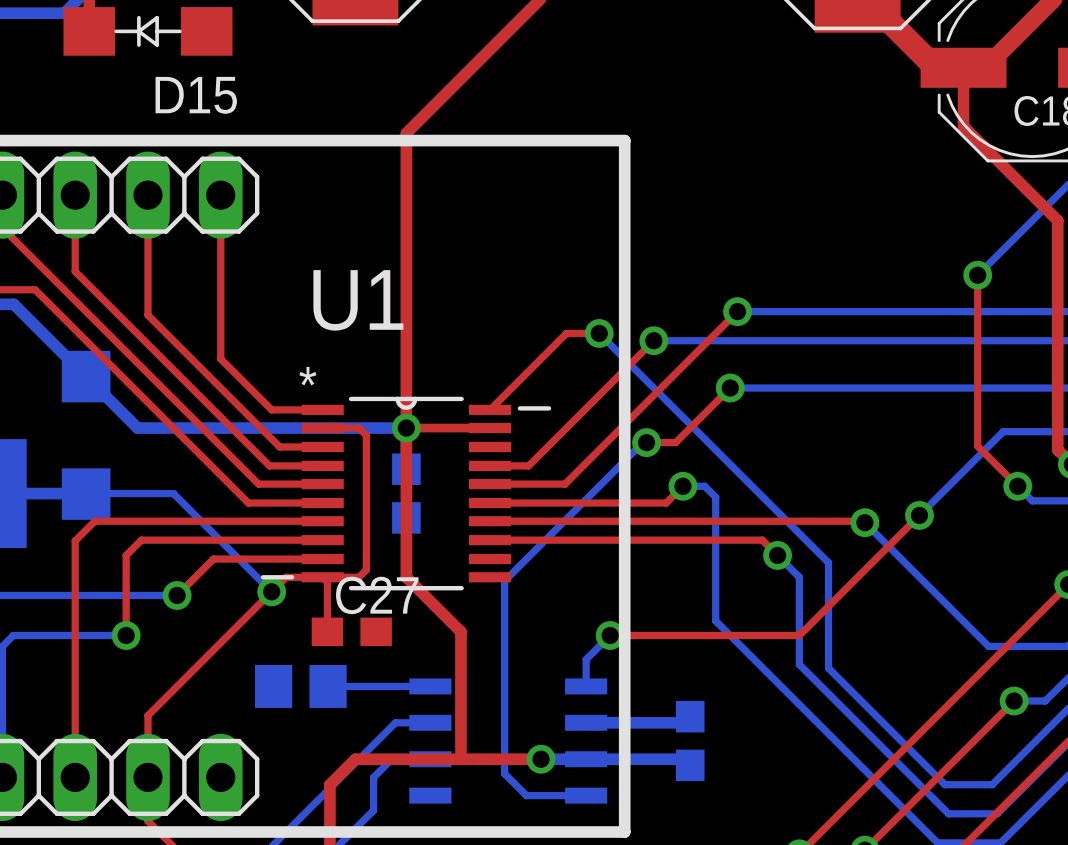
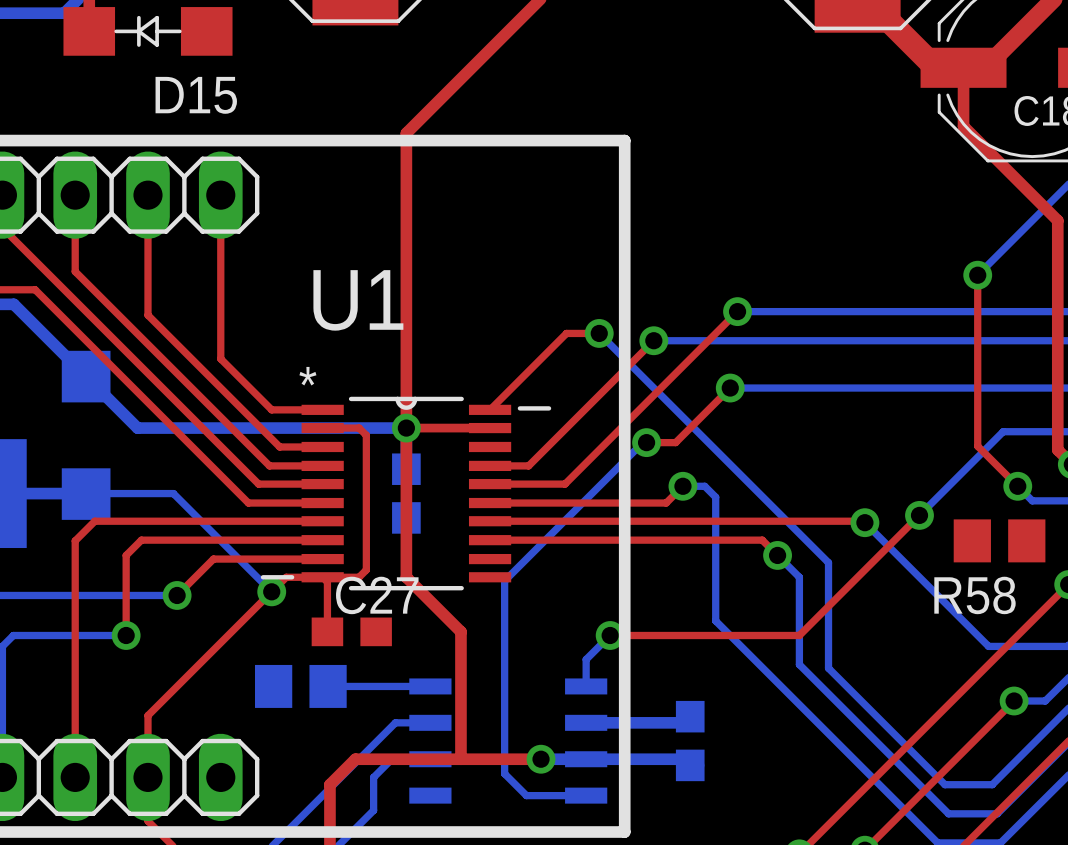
R58: none -> (999, 540)

